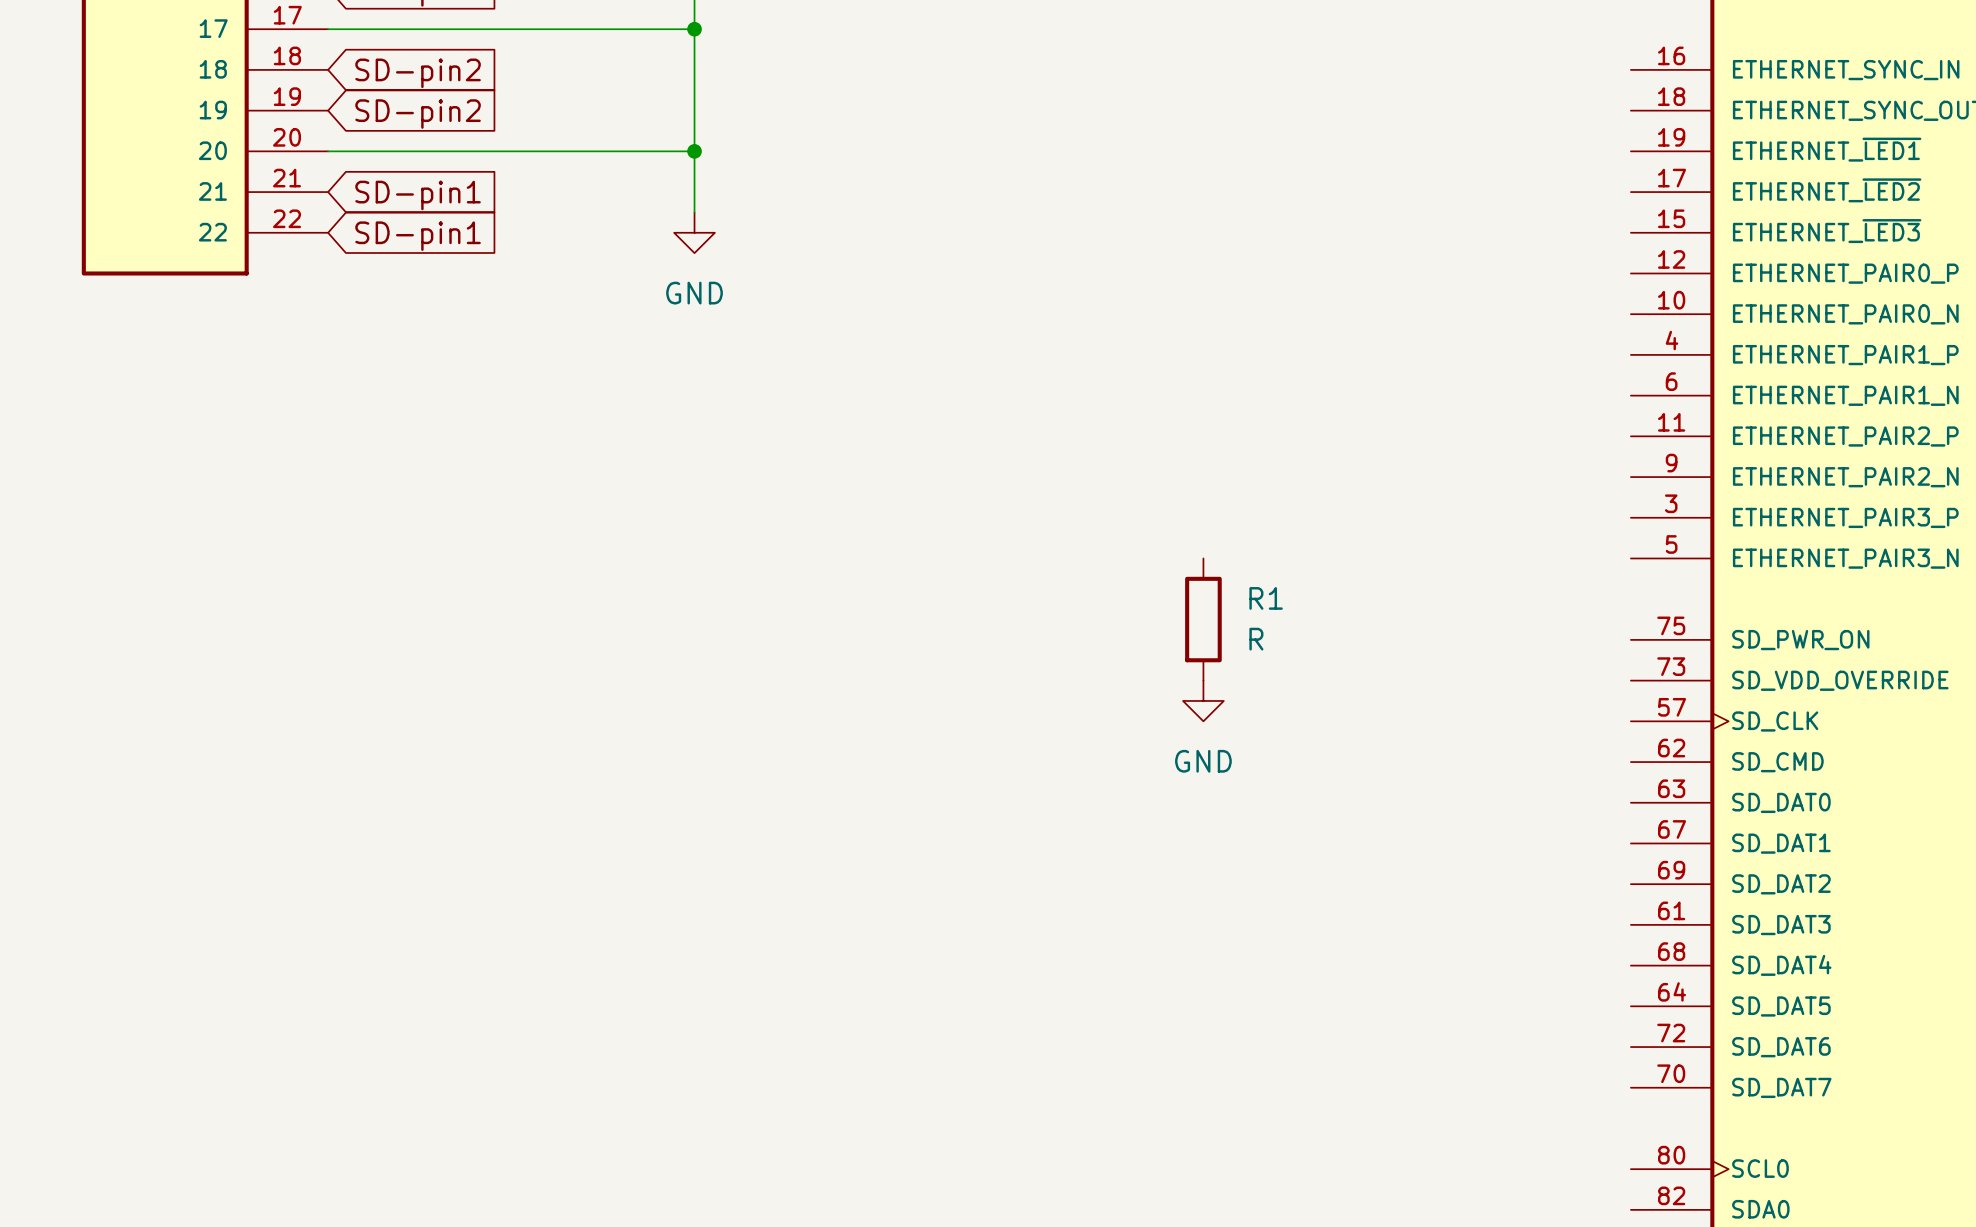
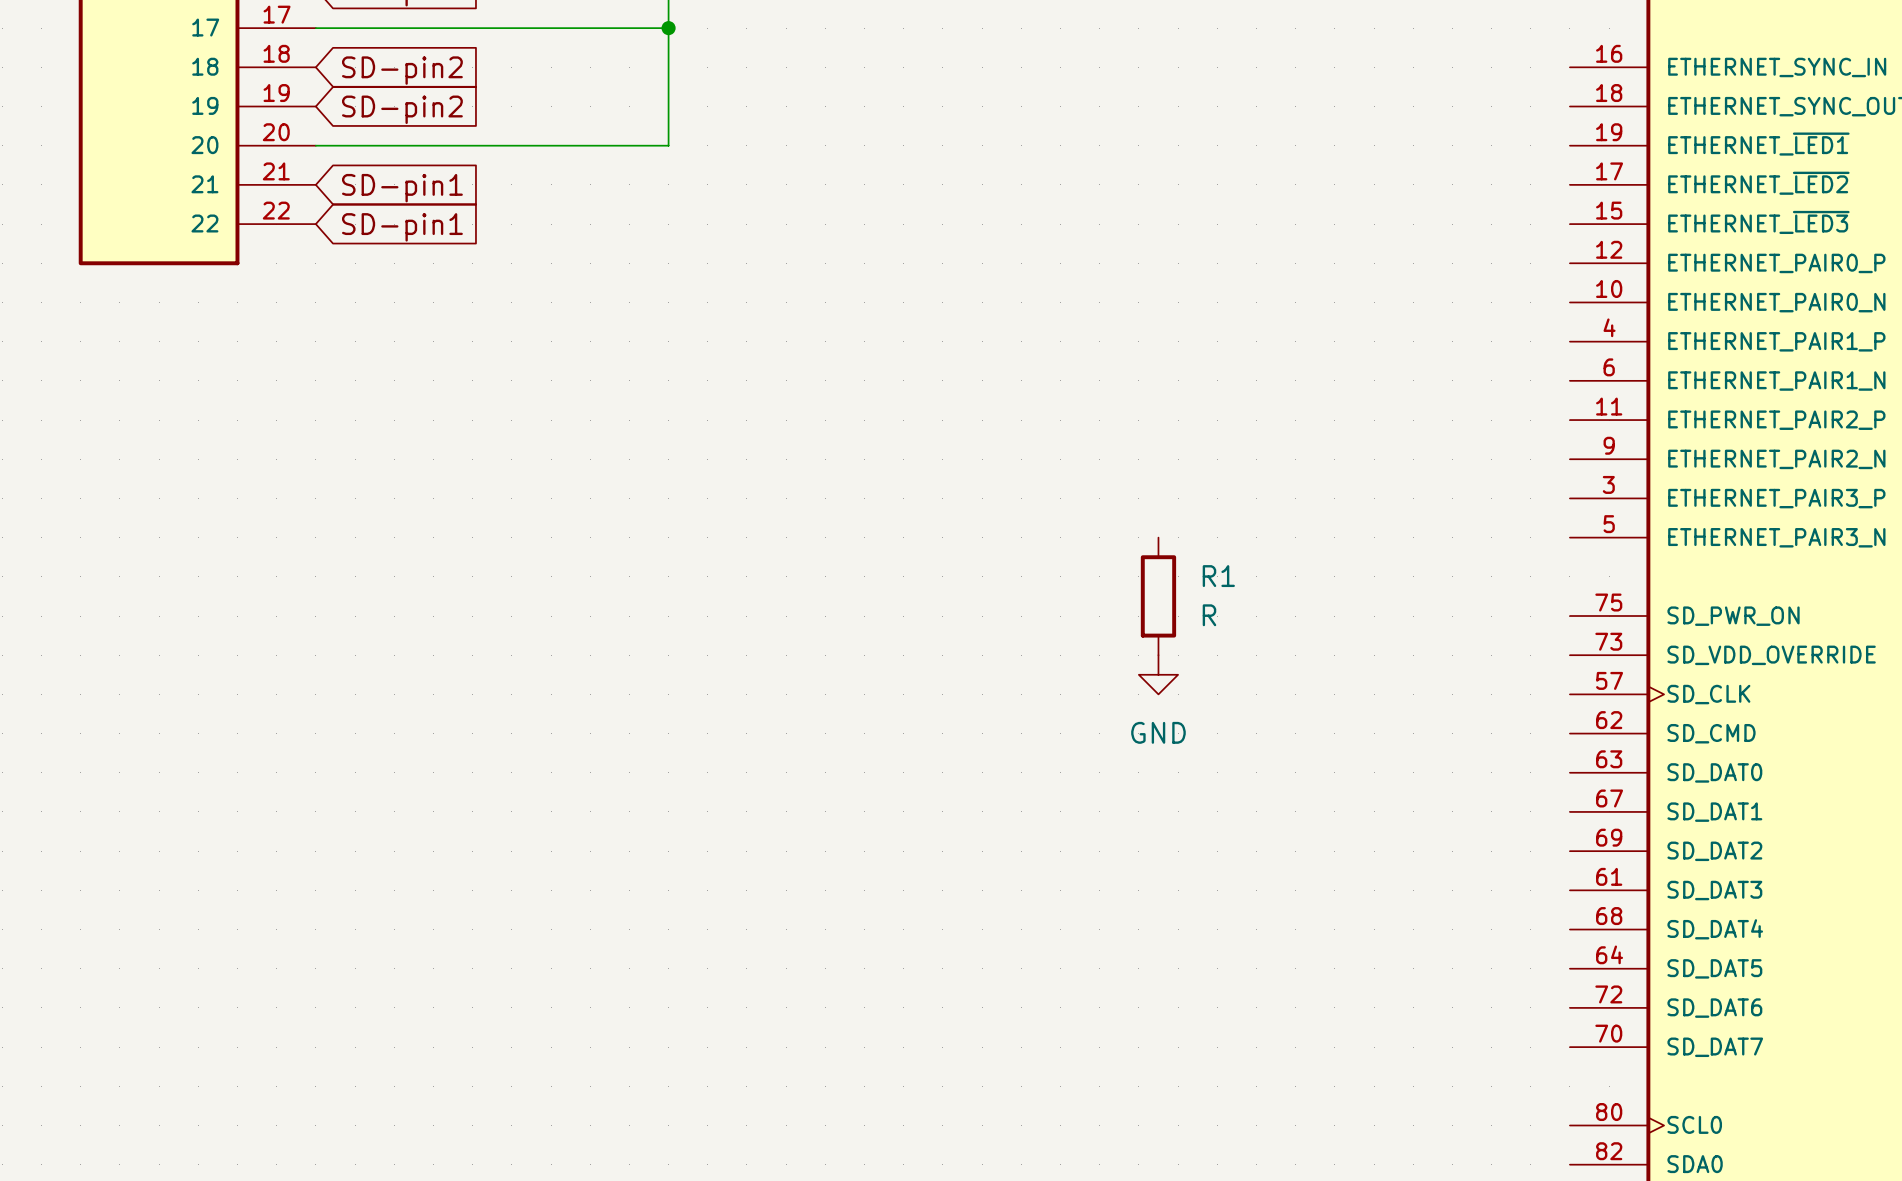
wire: (694, 151) (694, 212) -> none
junction: (694, 151) -> none
power symbol: GND (694, 232) -> none

